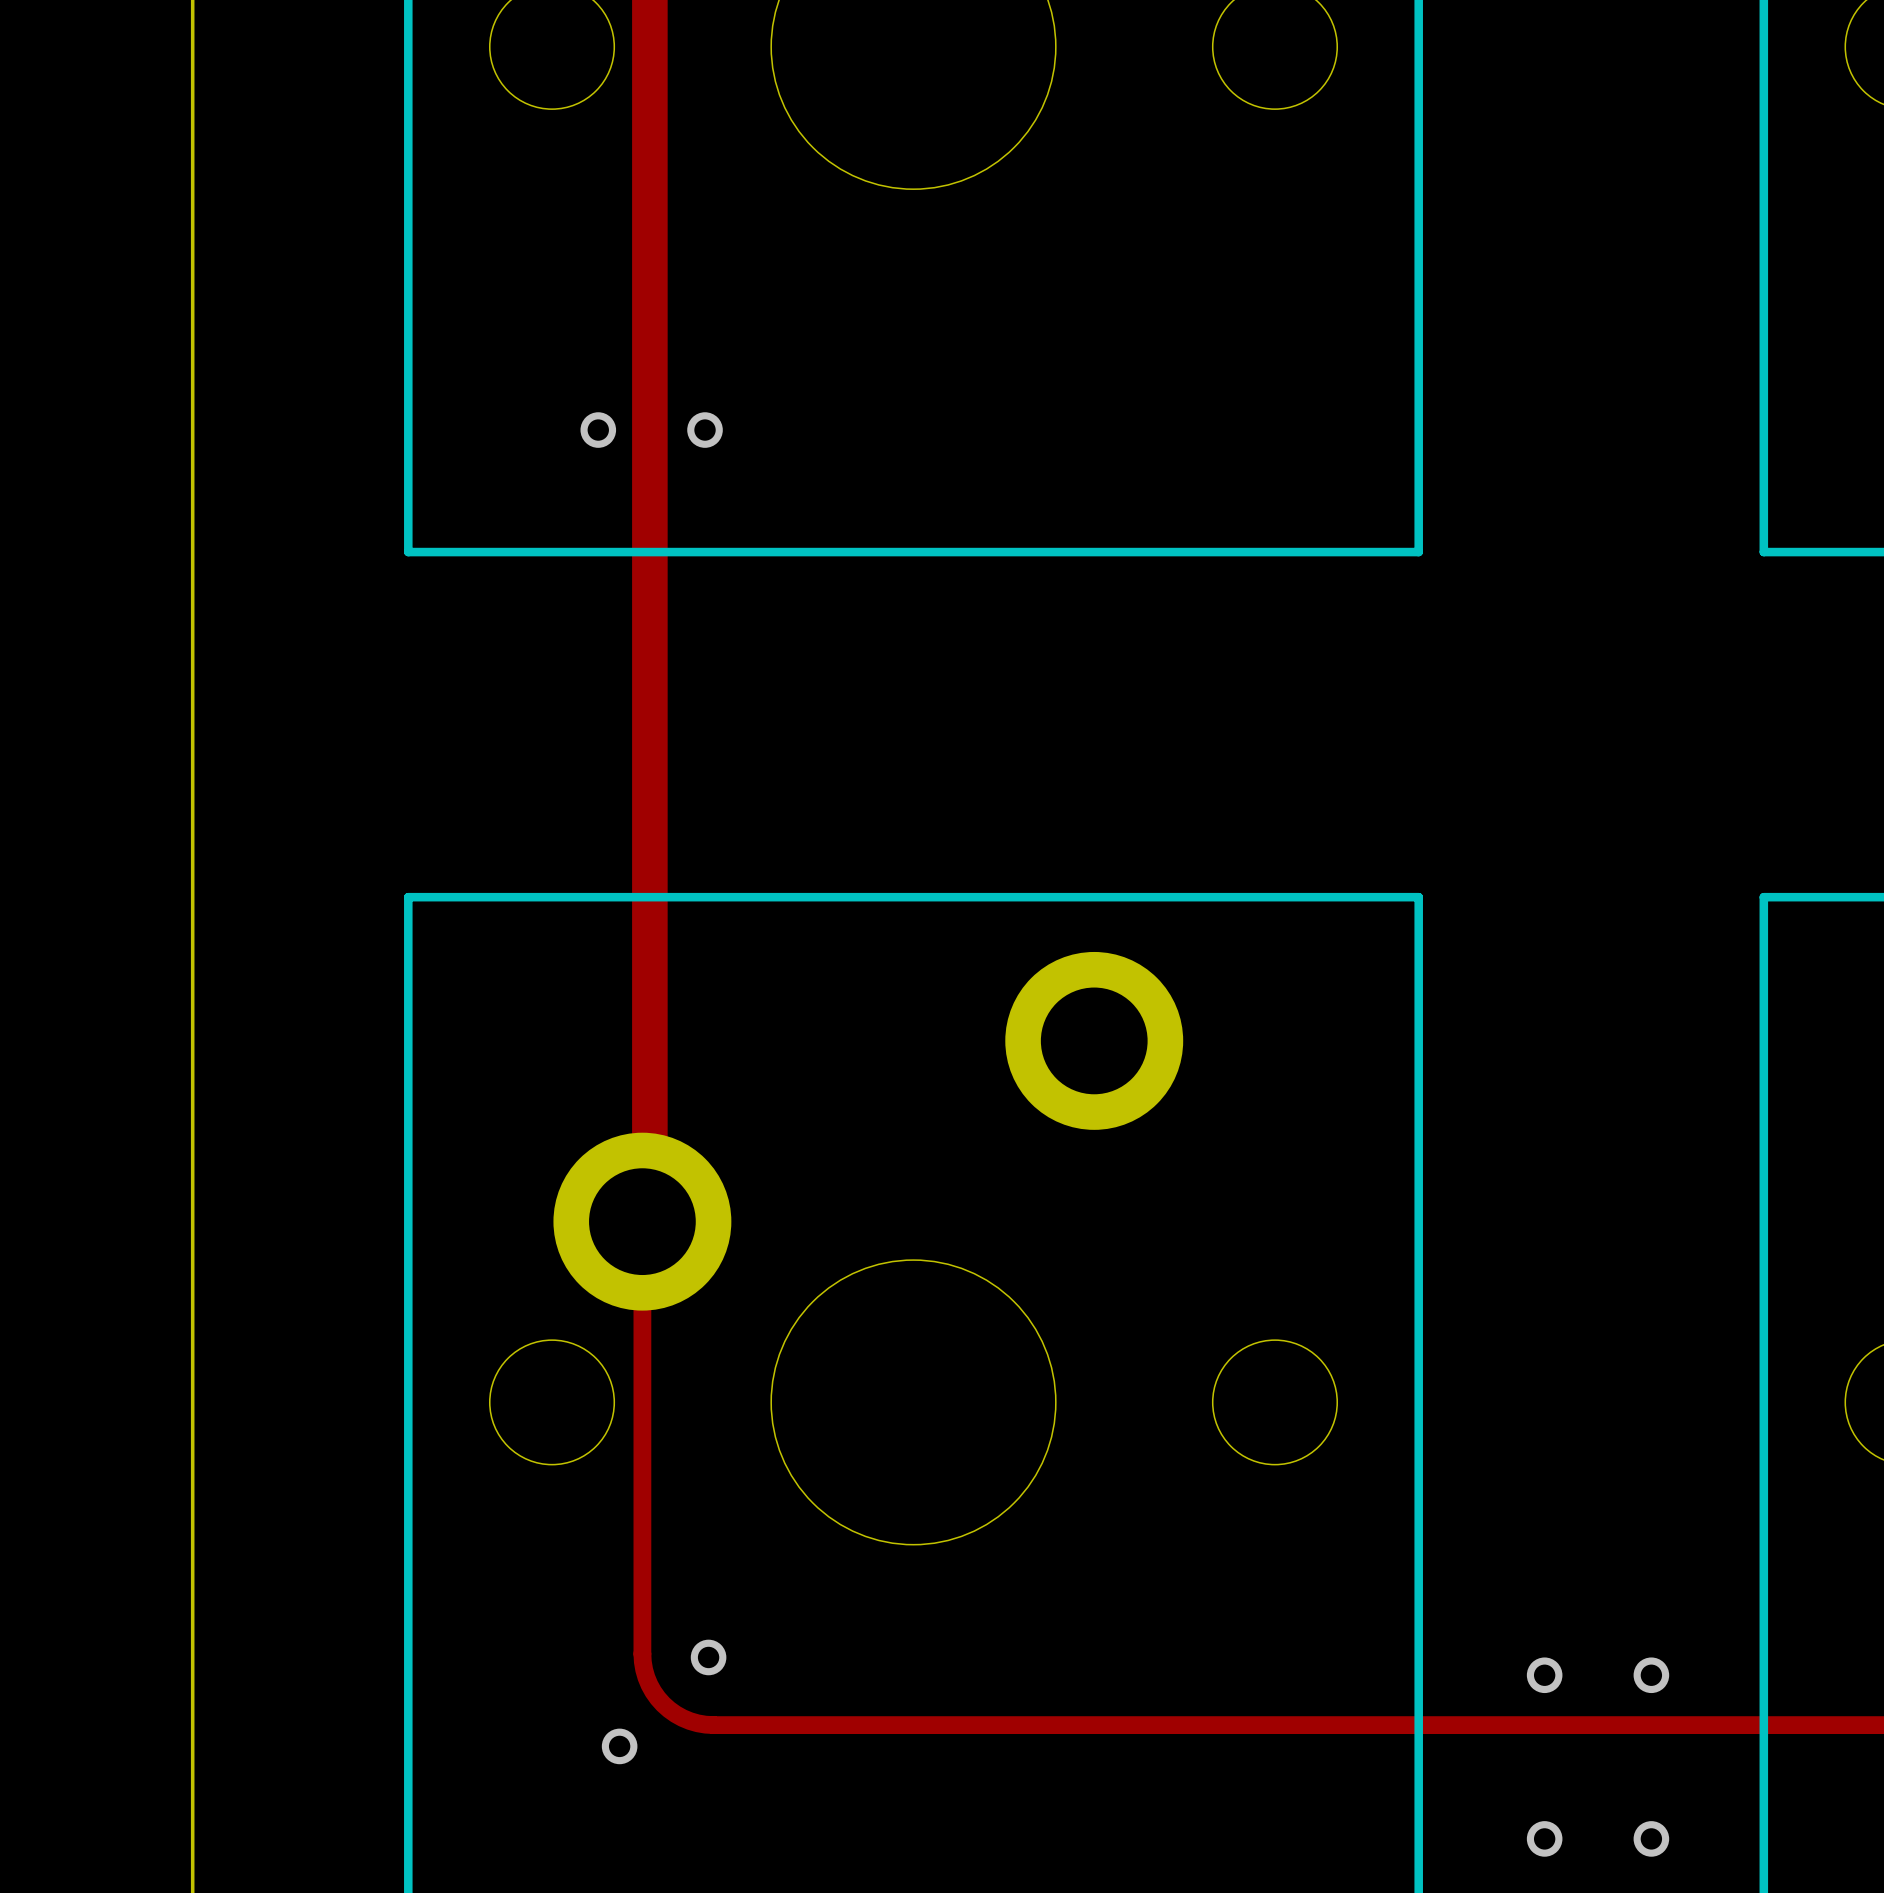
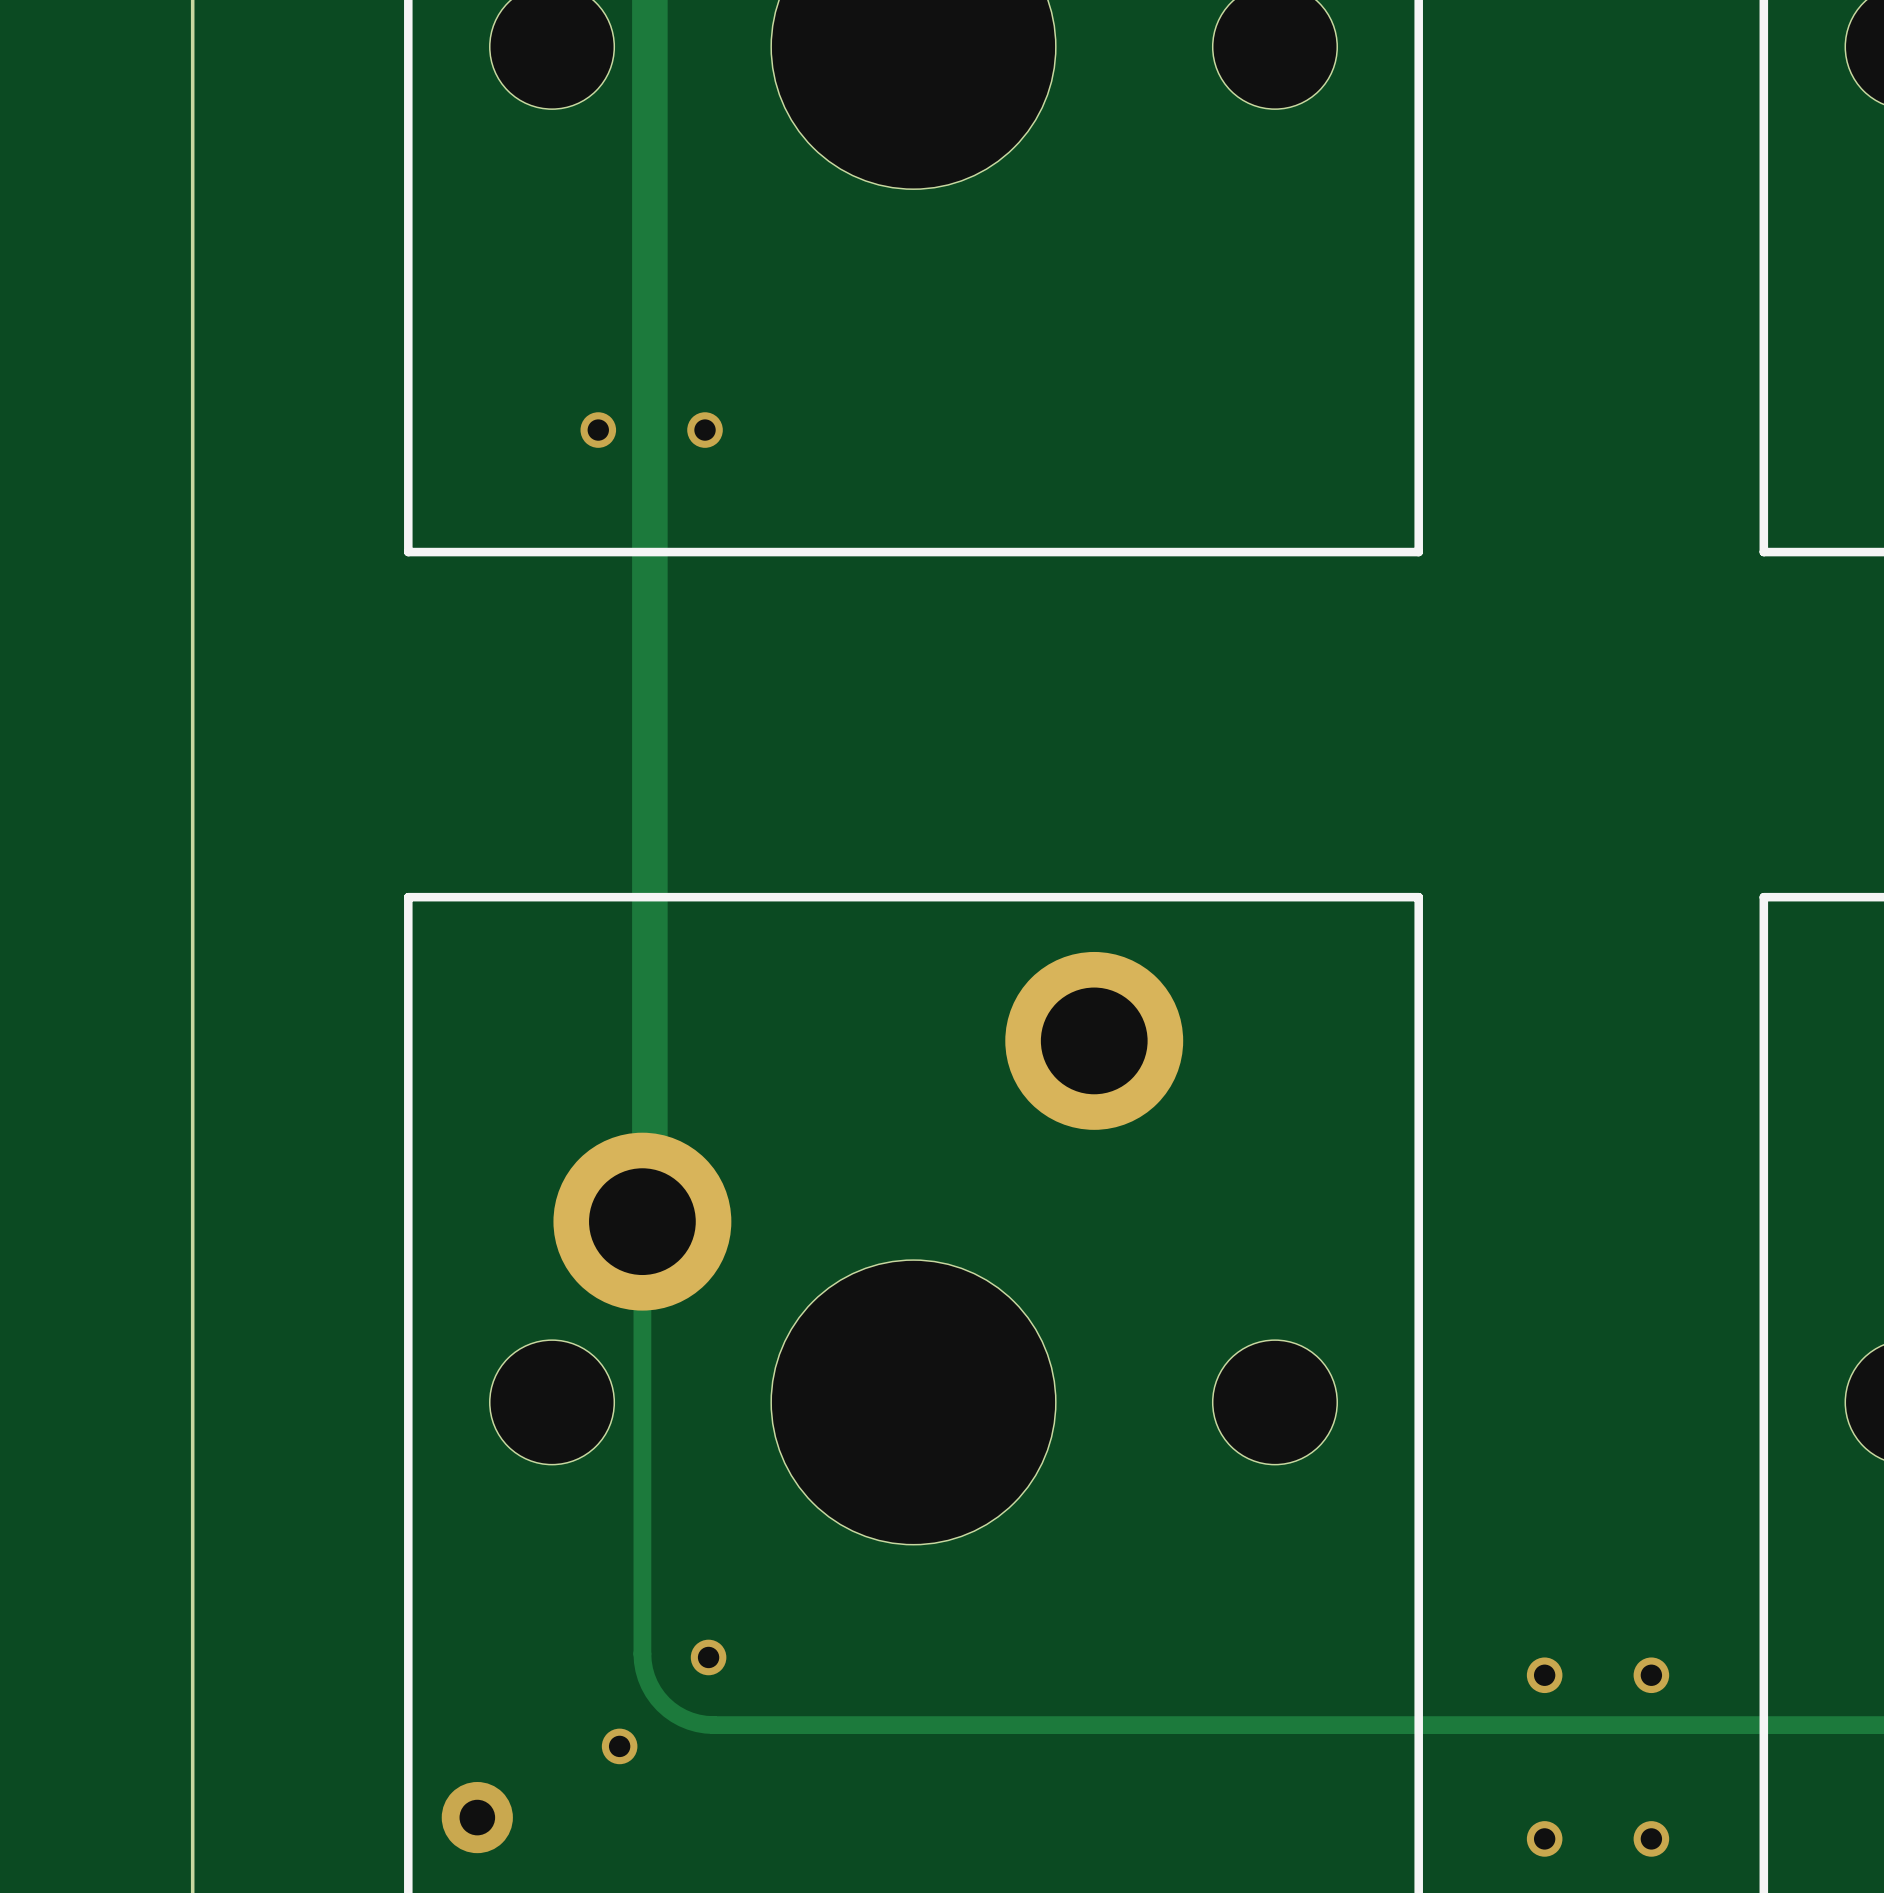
via: none -> (477, 1817)

